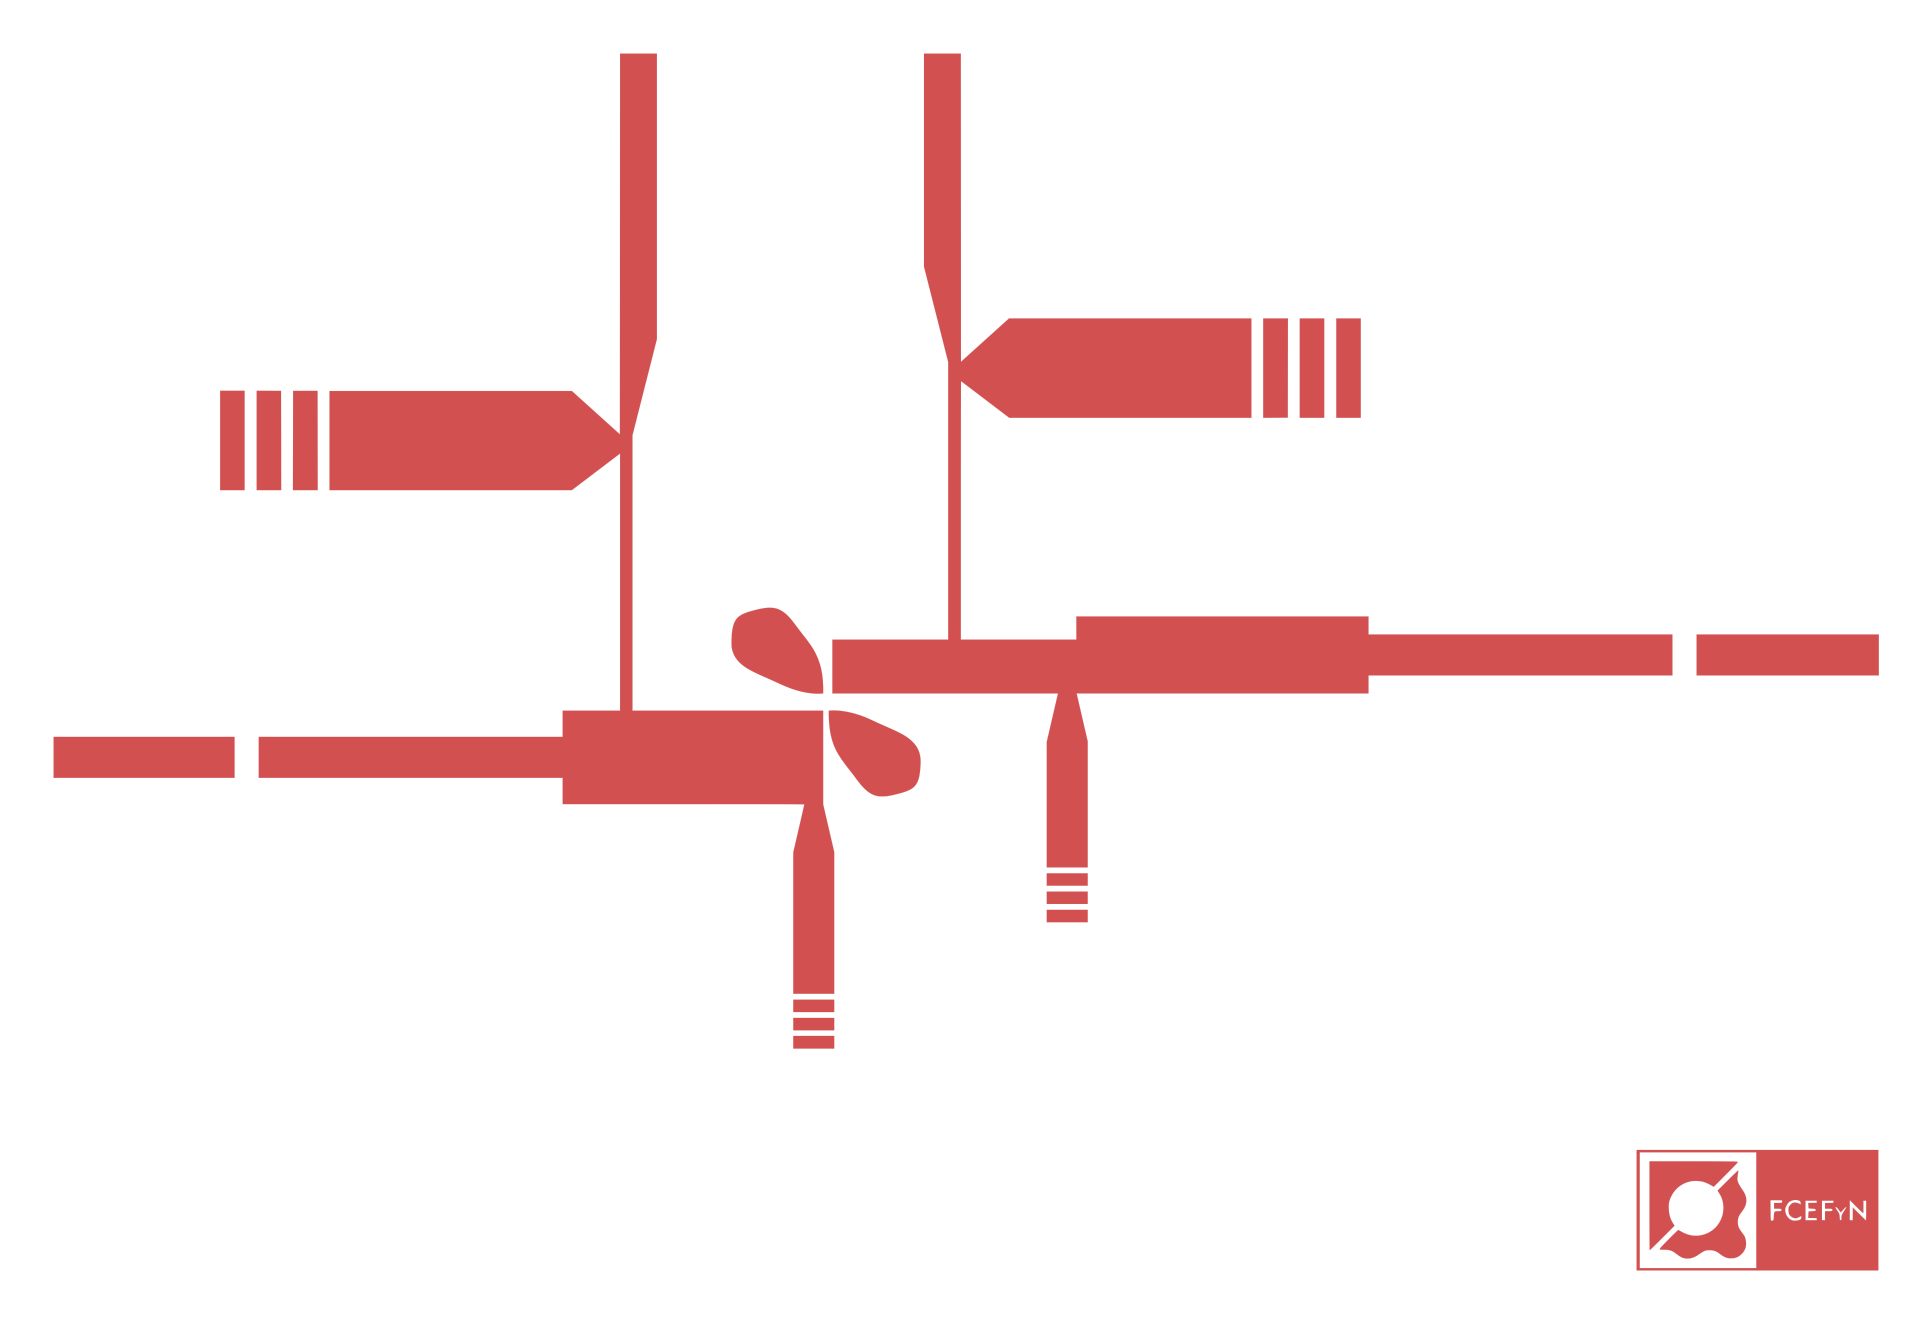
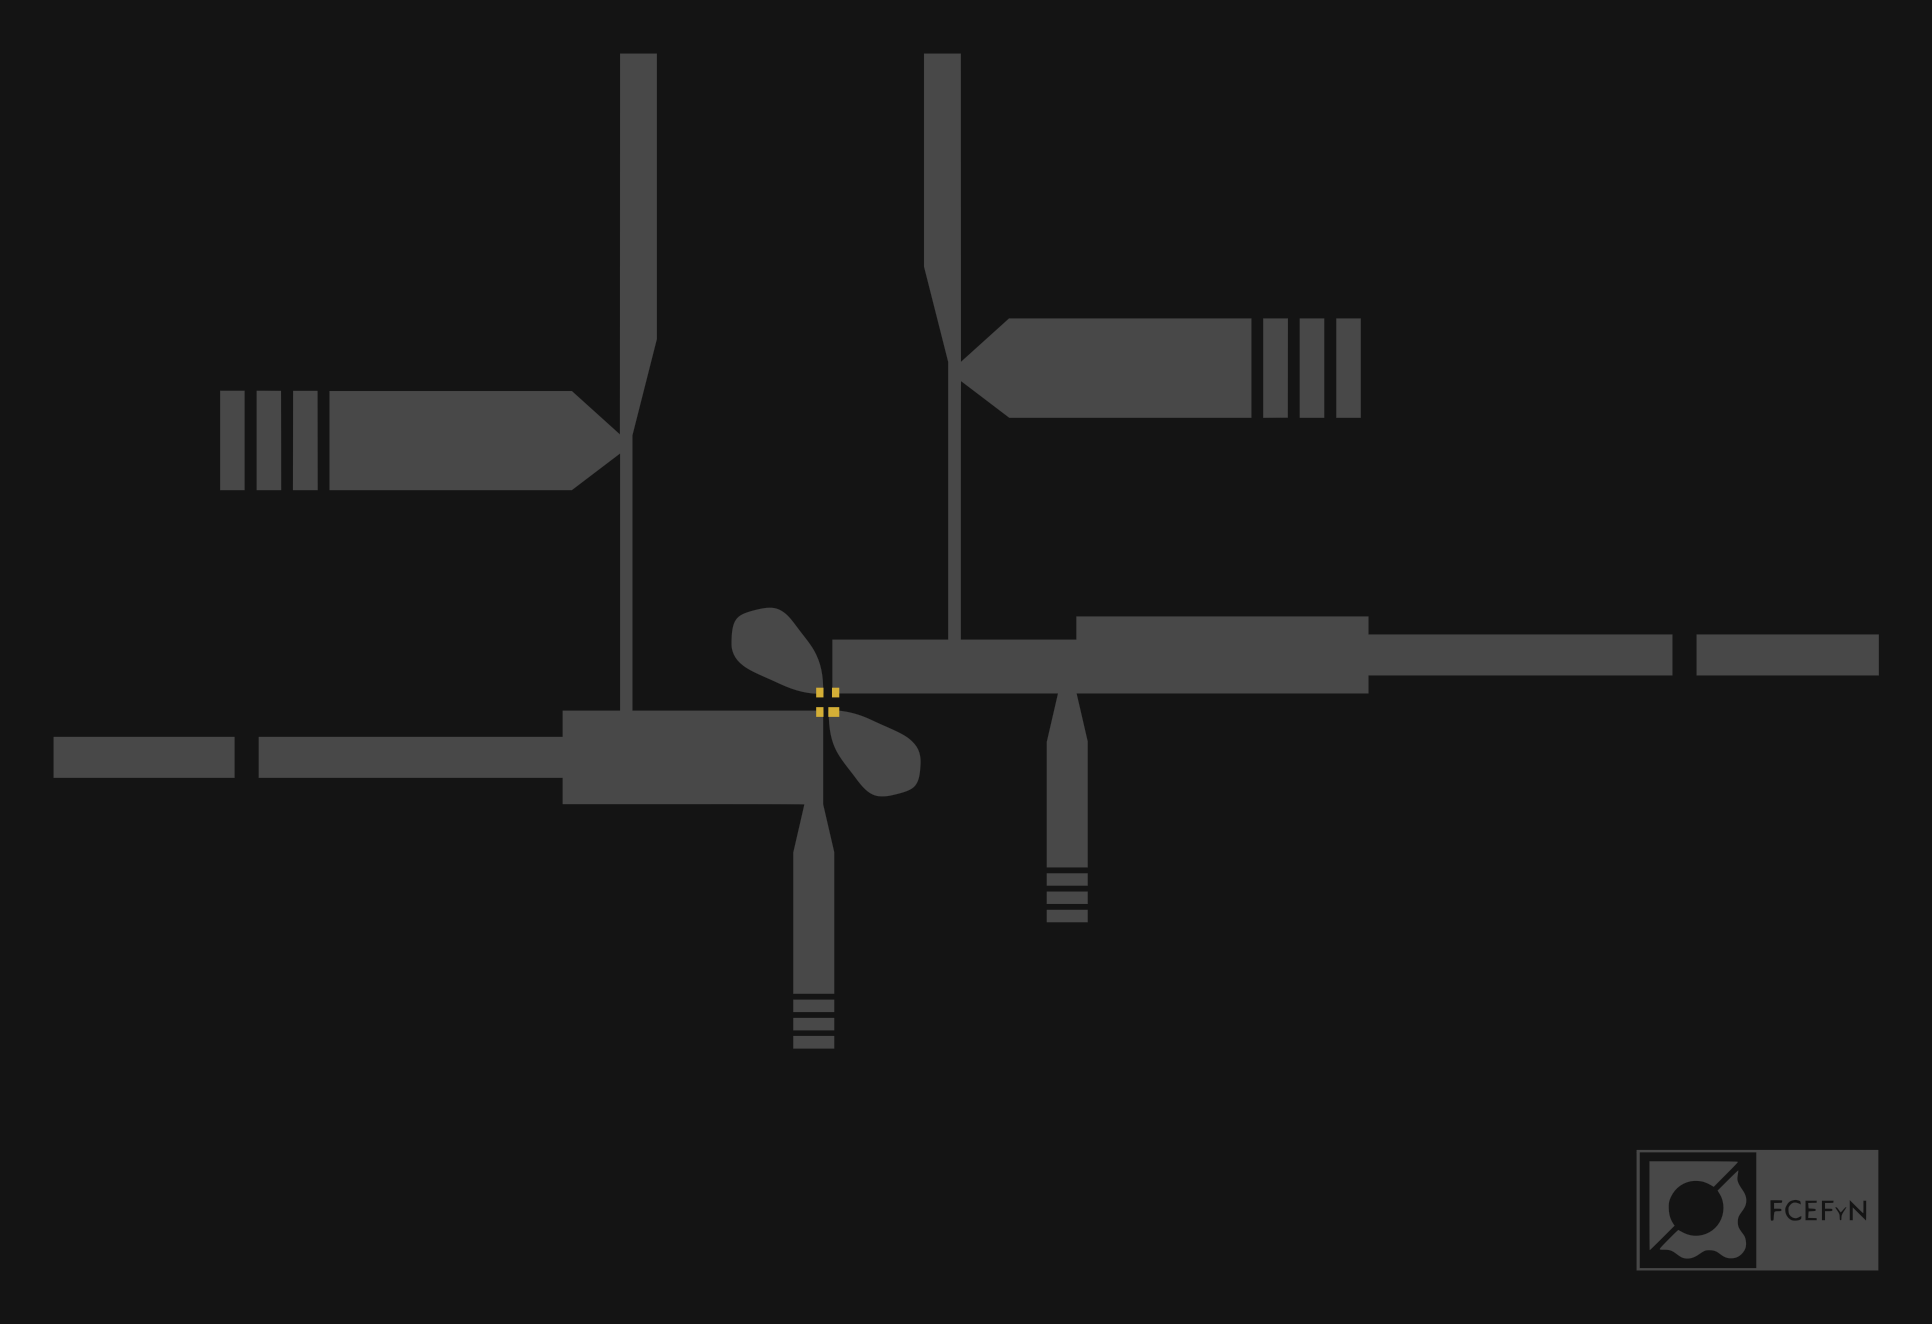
part: none -> (827, 702)

